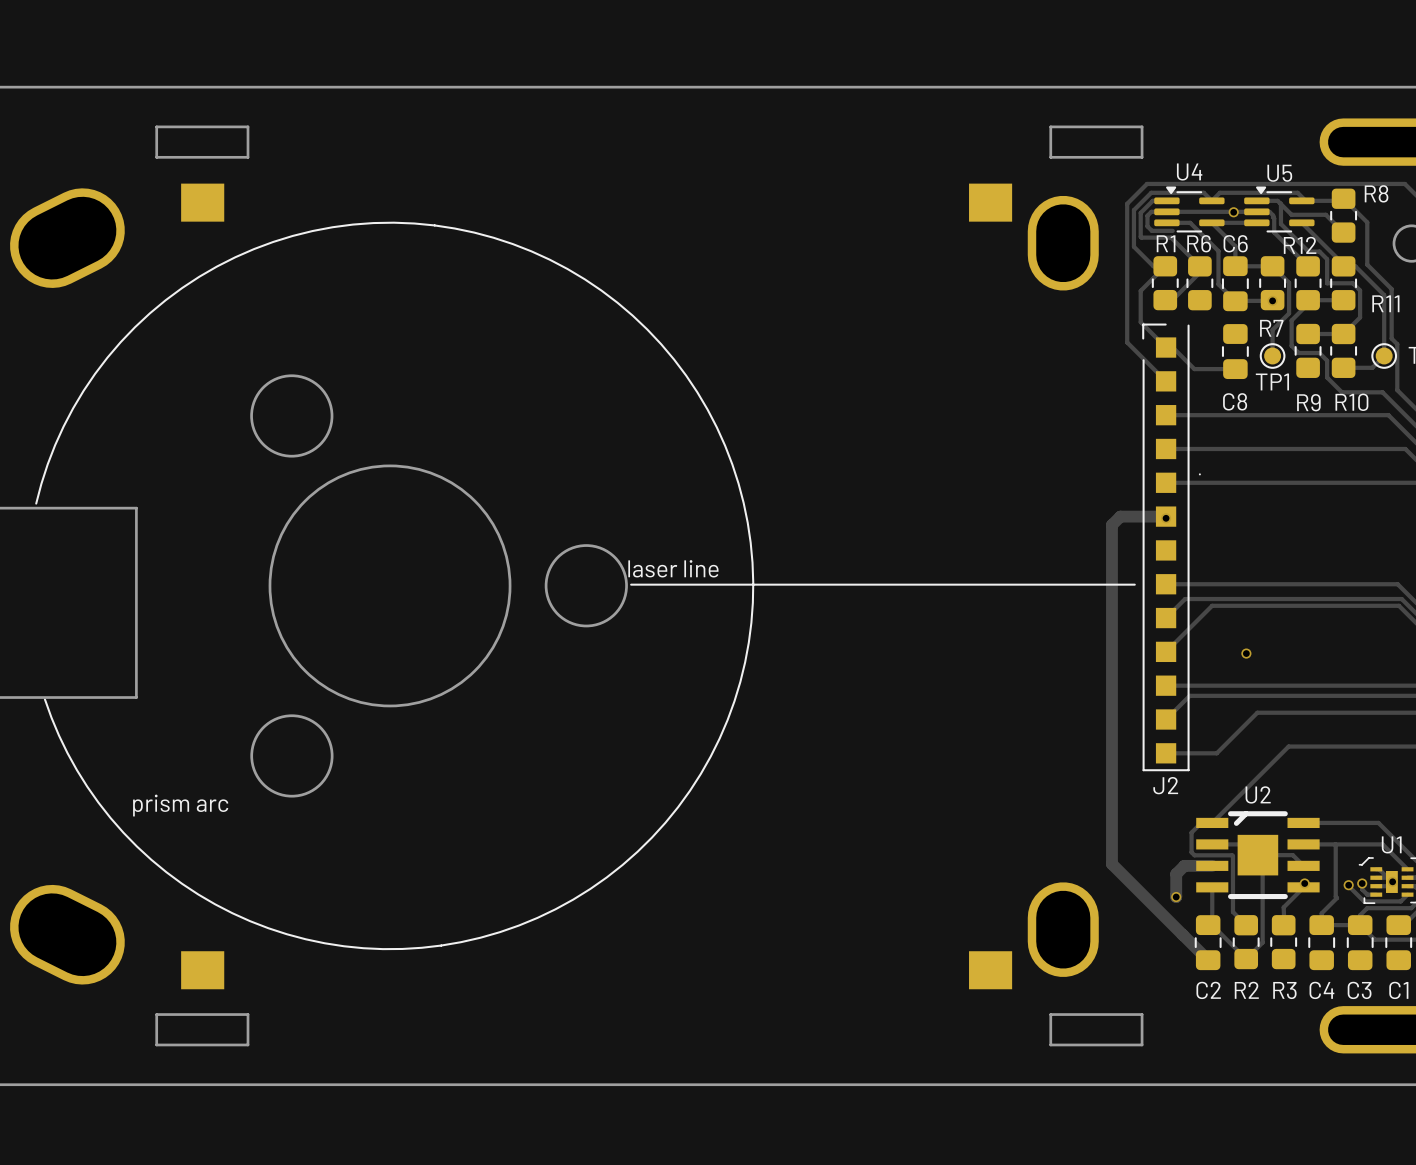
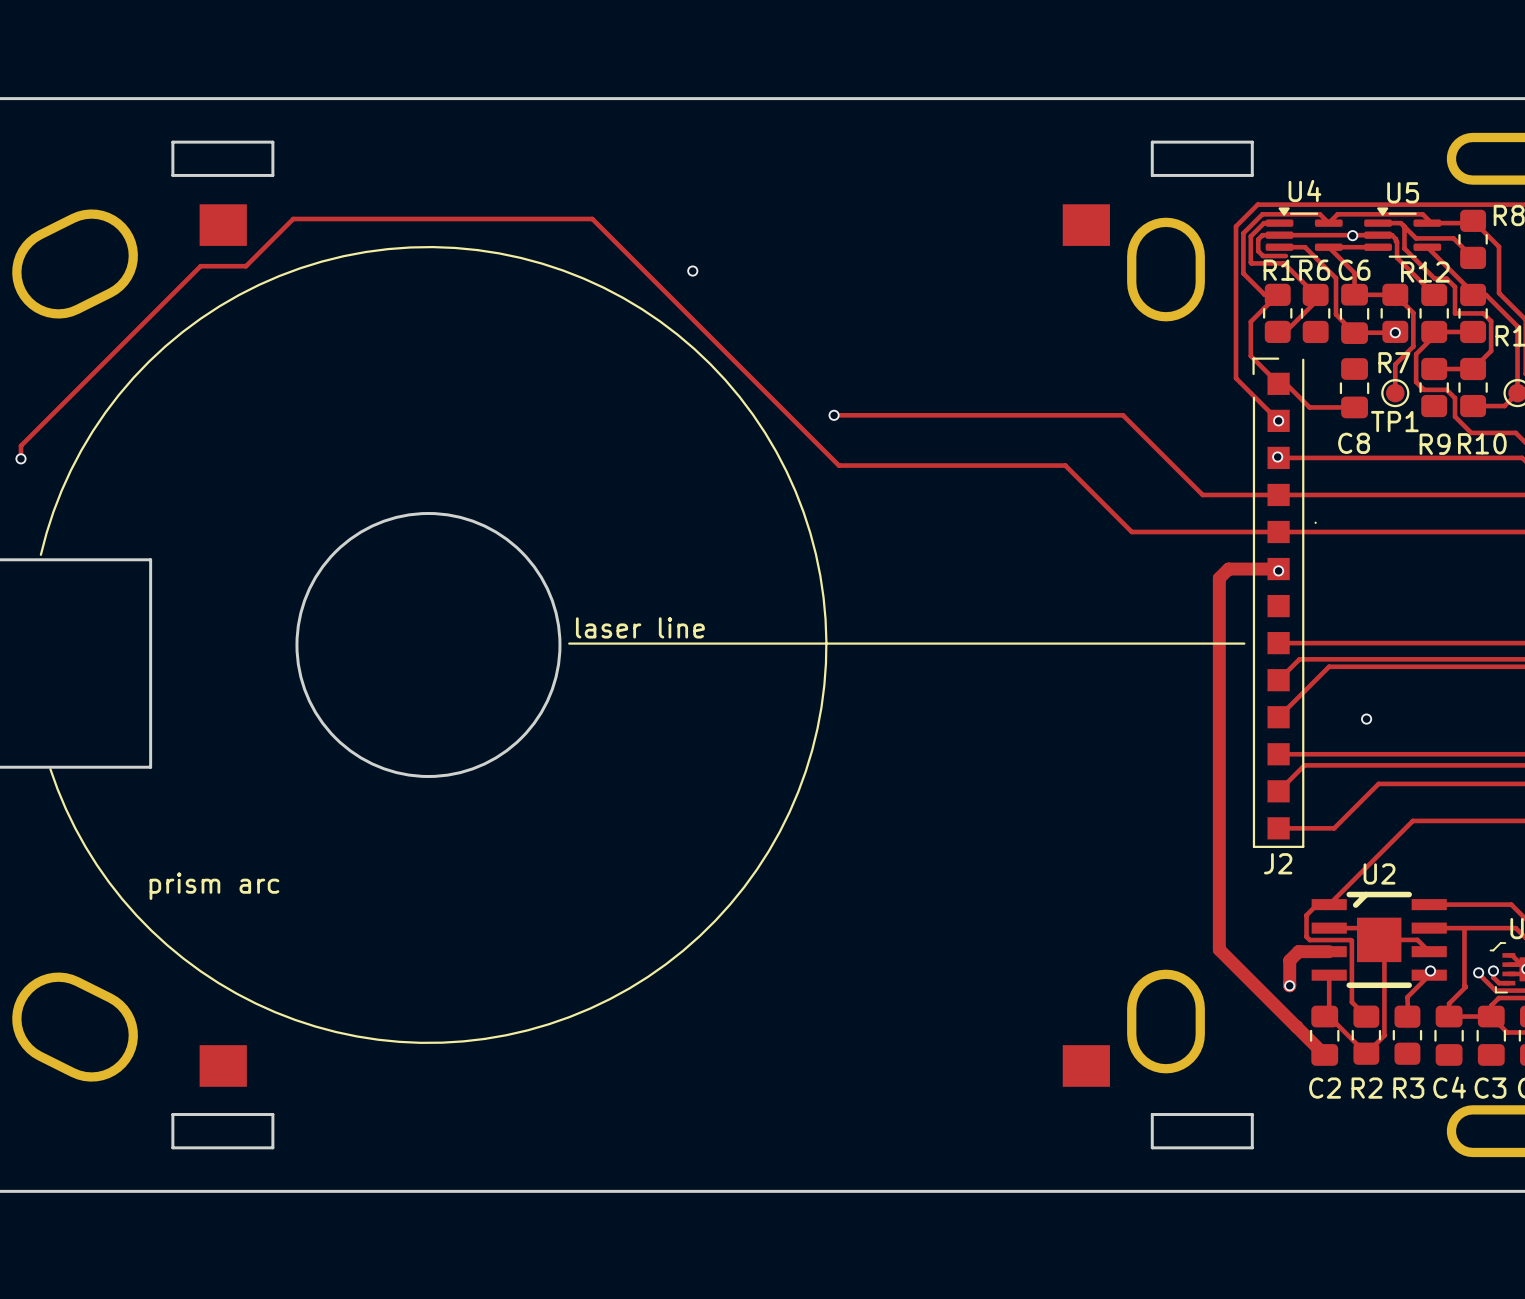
via: none -> (692, 271)
round board edge: [250, 374, 334, 458] -> none
track: none -> (833, 415) (1123, 415) (1202, 494) (1278, 494)
via: none -> (834, 415)
via: none -> (1278, 420)
via: none -> (1277, 456)
track: none -> (20, 458) (20, 445) (200, 266) (246, 266) (293, 218) (592, 218) (838, 465) (1065, 465) (1131, 532) (1278, 532)
via: none -> (20, 458)
round board edge: [544, 544, 628, 628] -> none
text position: laser line (673, 568) -> laser line (640, 627)
line: none -> (569, 643) (692, 643)
round board edge: [250, 714, 334, 798] -> none

